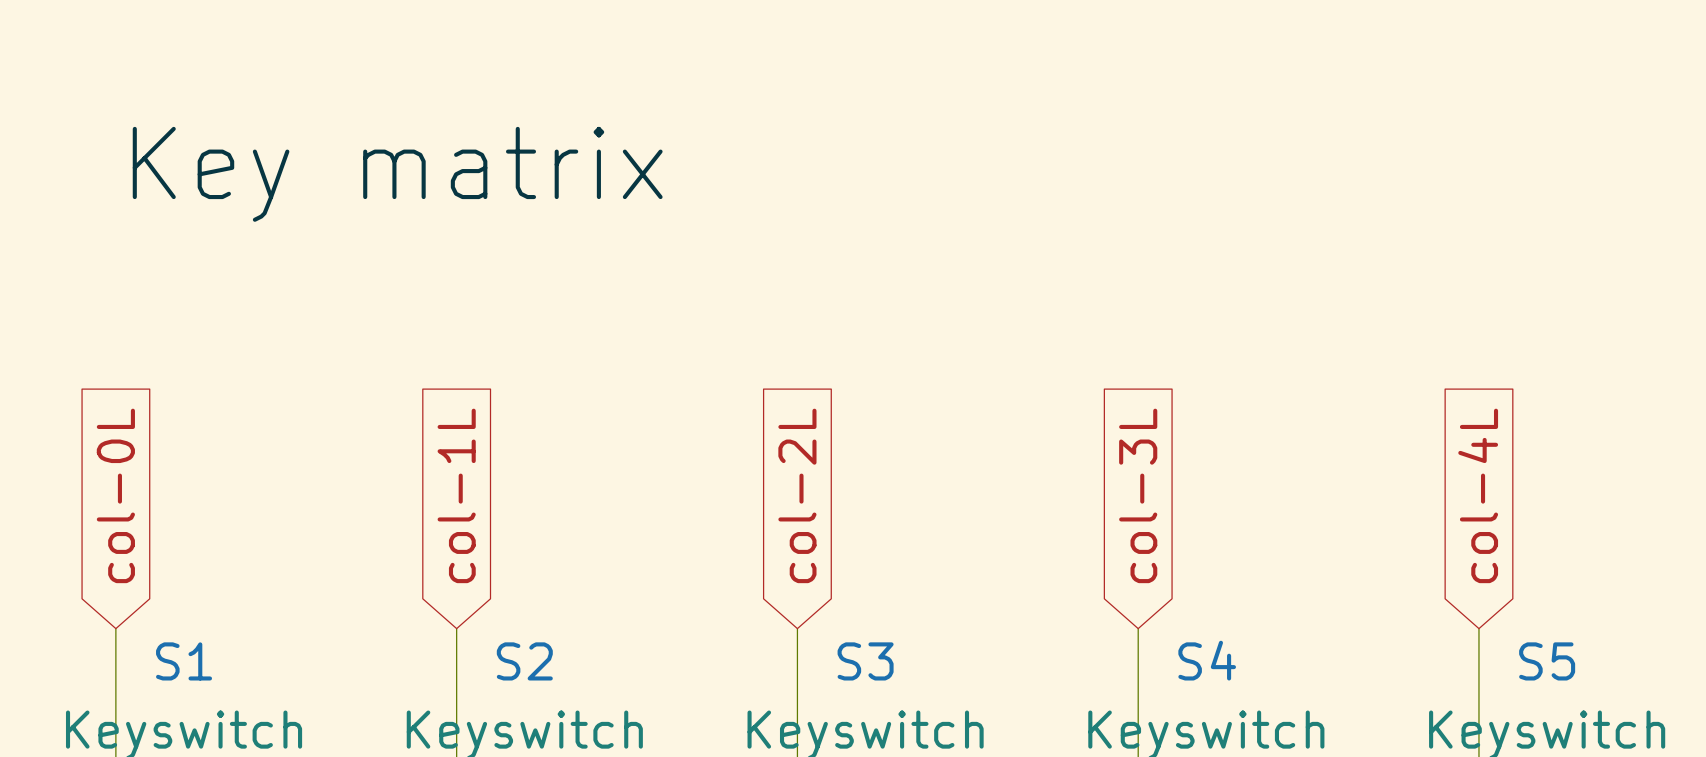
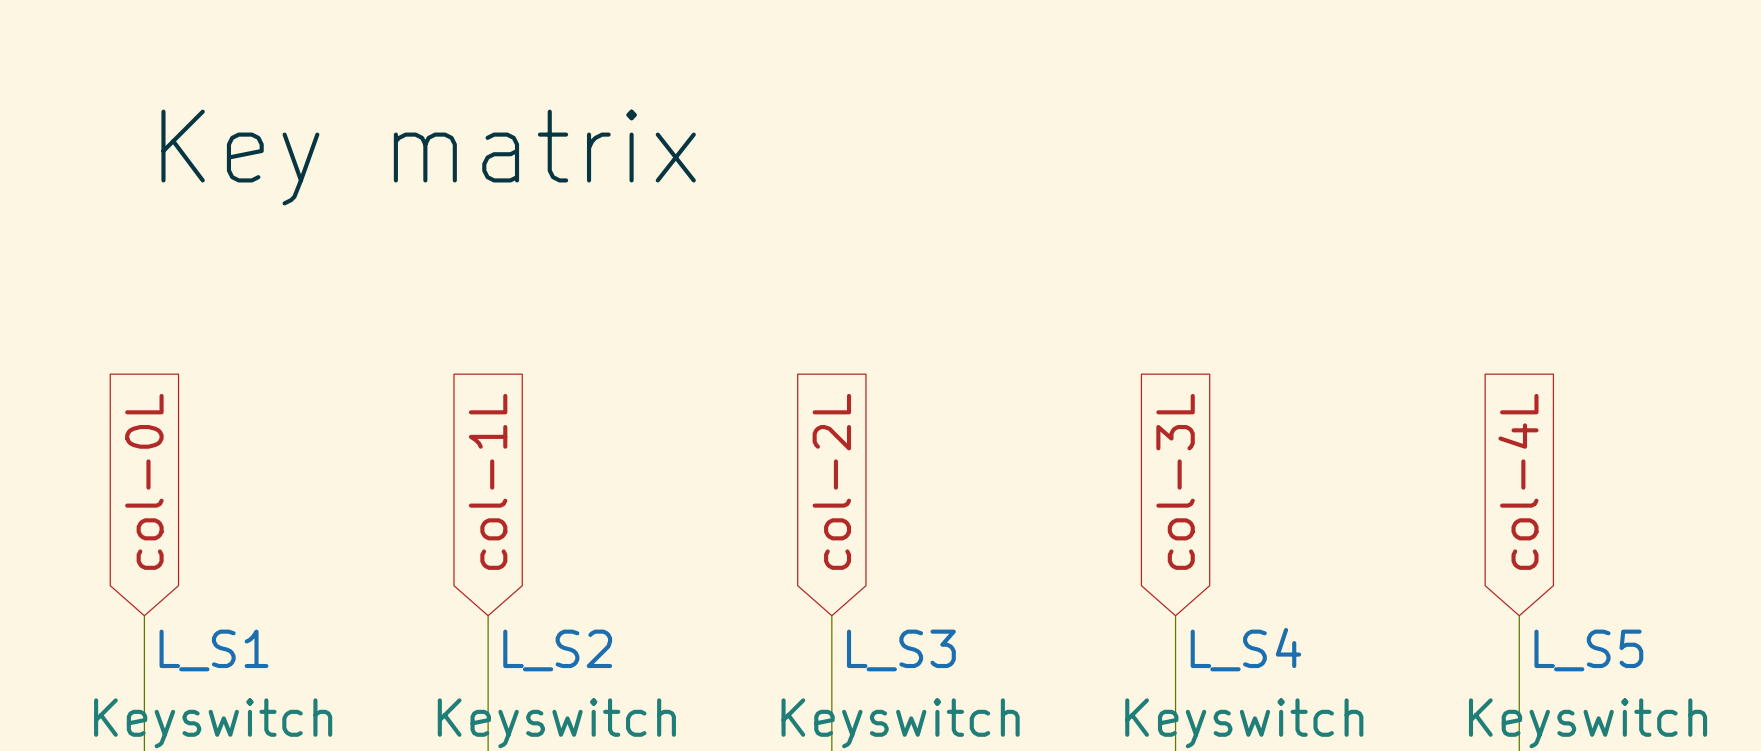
S4 name: S4 (1207, 660) -> L_S4 (1245, 649)
S1 name: S1 (184, 661) -> L_S1 (213, 650)
S2 name: S2 (524, 661) -> L_S2 (557, 650)
S3 name: S3 (865, 661) -> L_S3 (901, 650)
S5 name: S5 (1547, 661) -> L_S5 (1588, 650)

